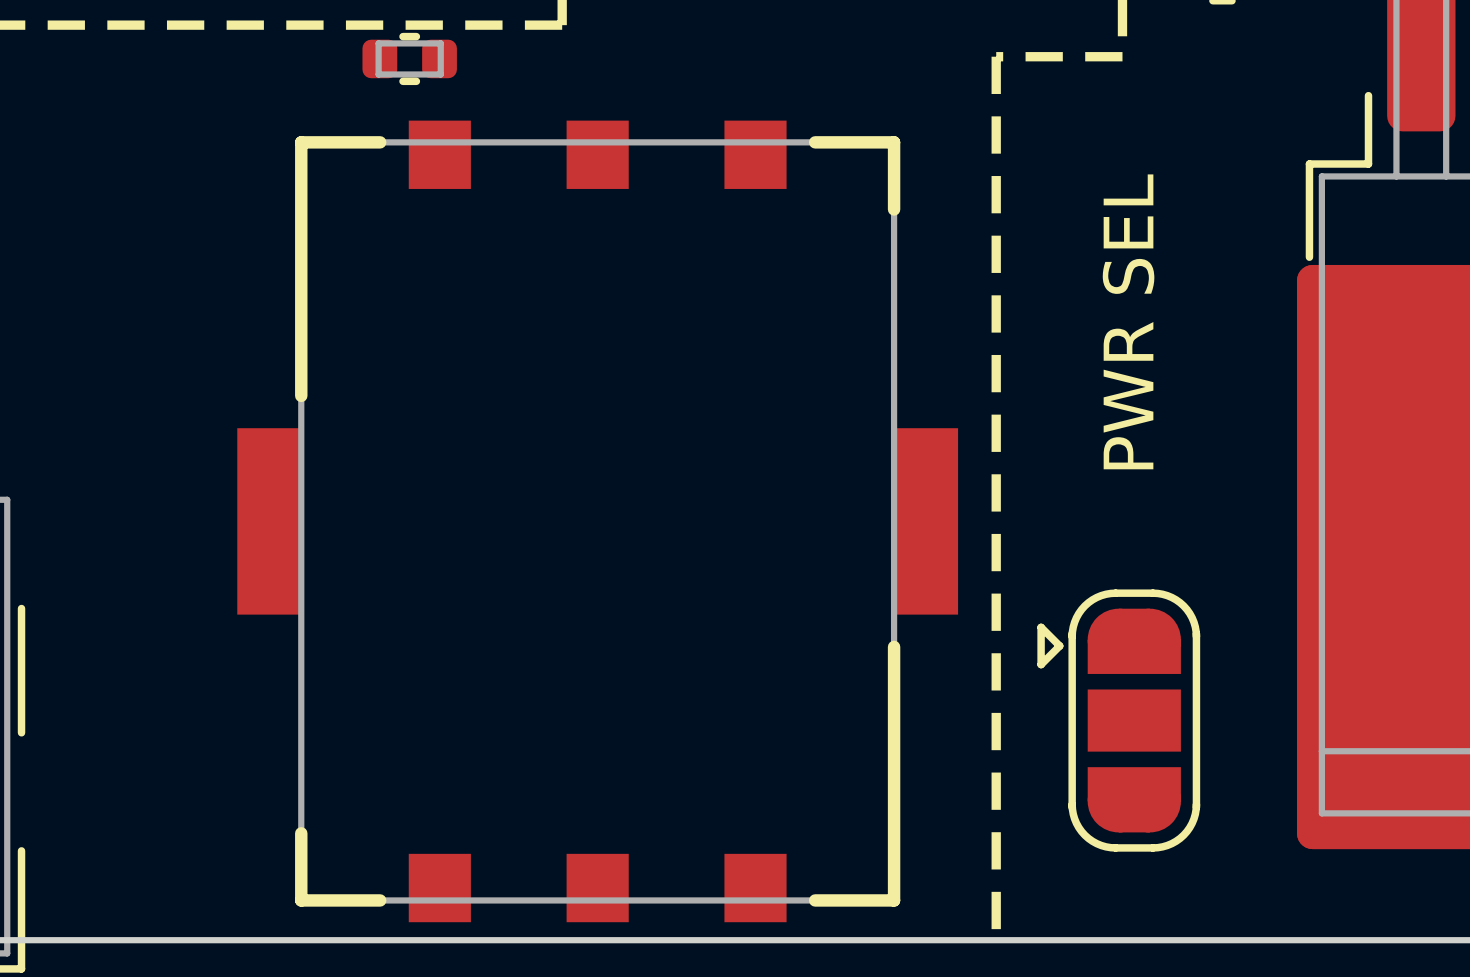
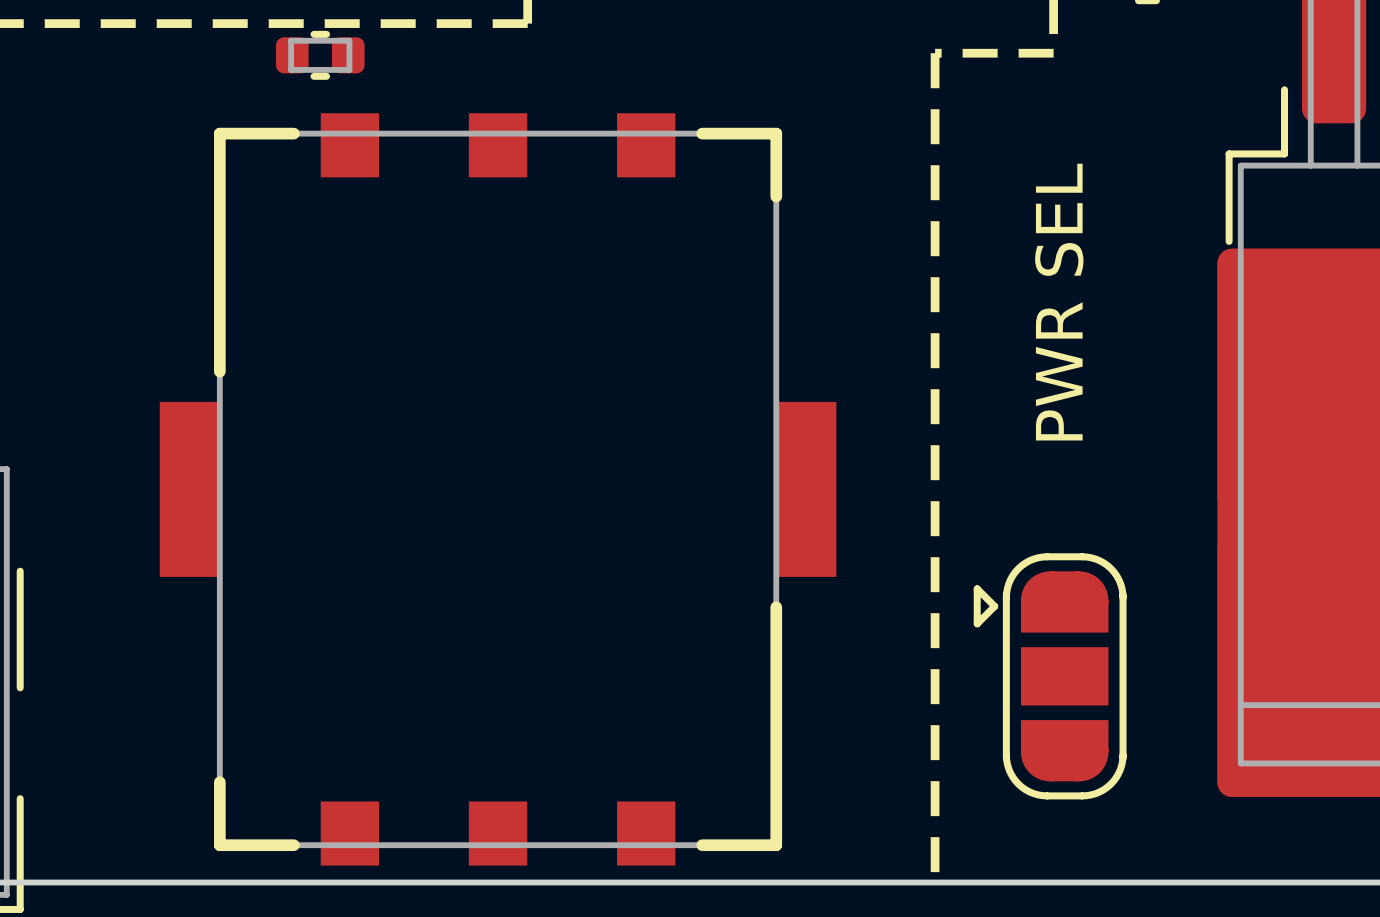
part position: (409, 58) -> (320, 55)
part position: (597, 521) -> (498, 489)

